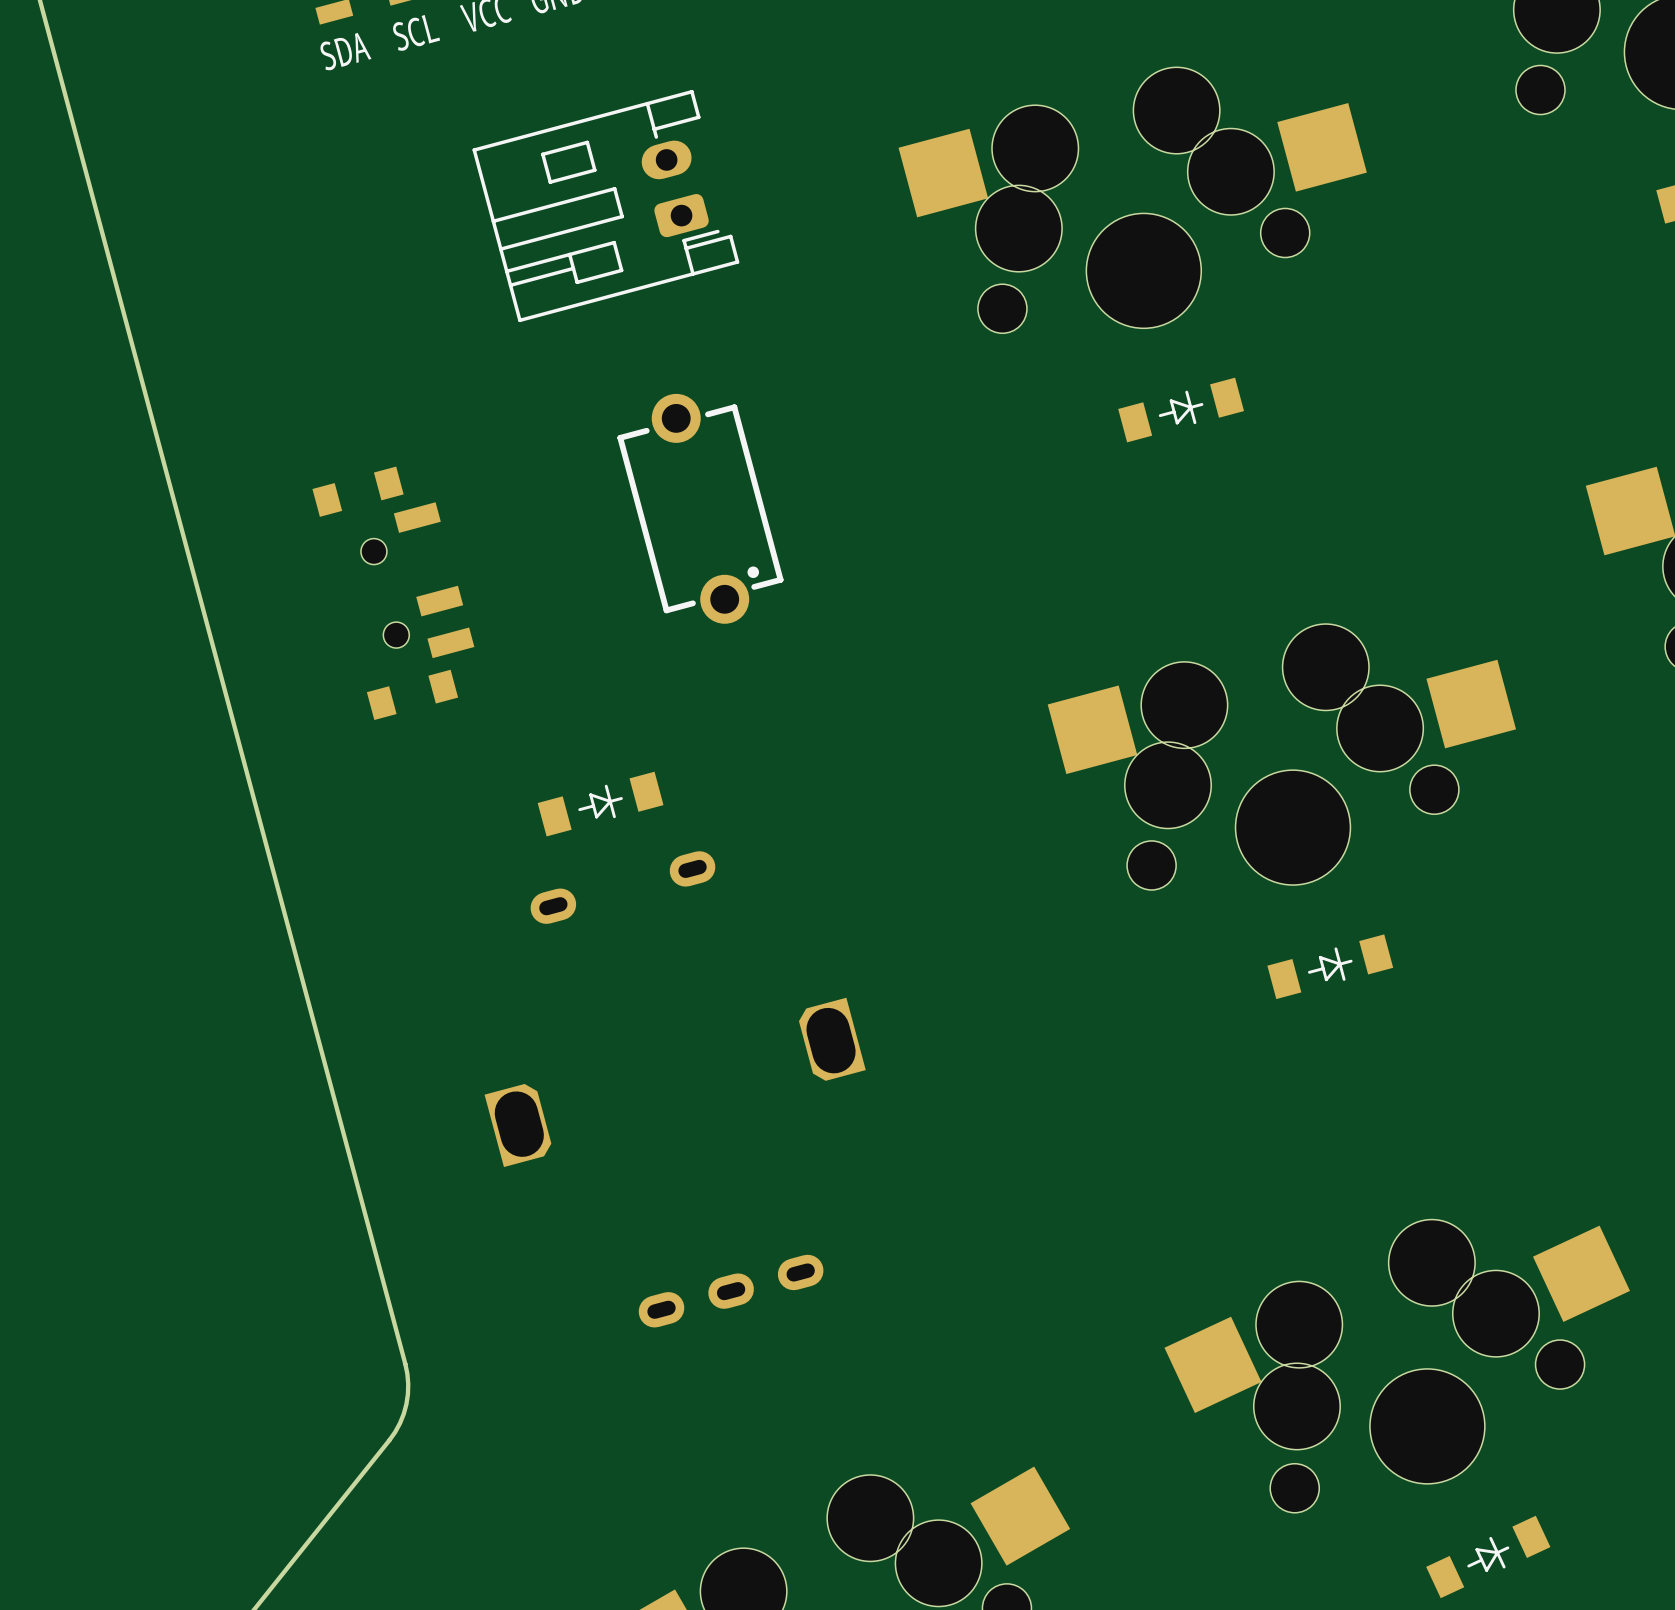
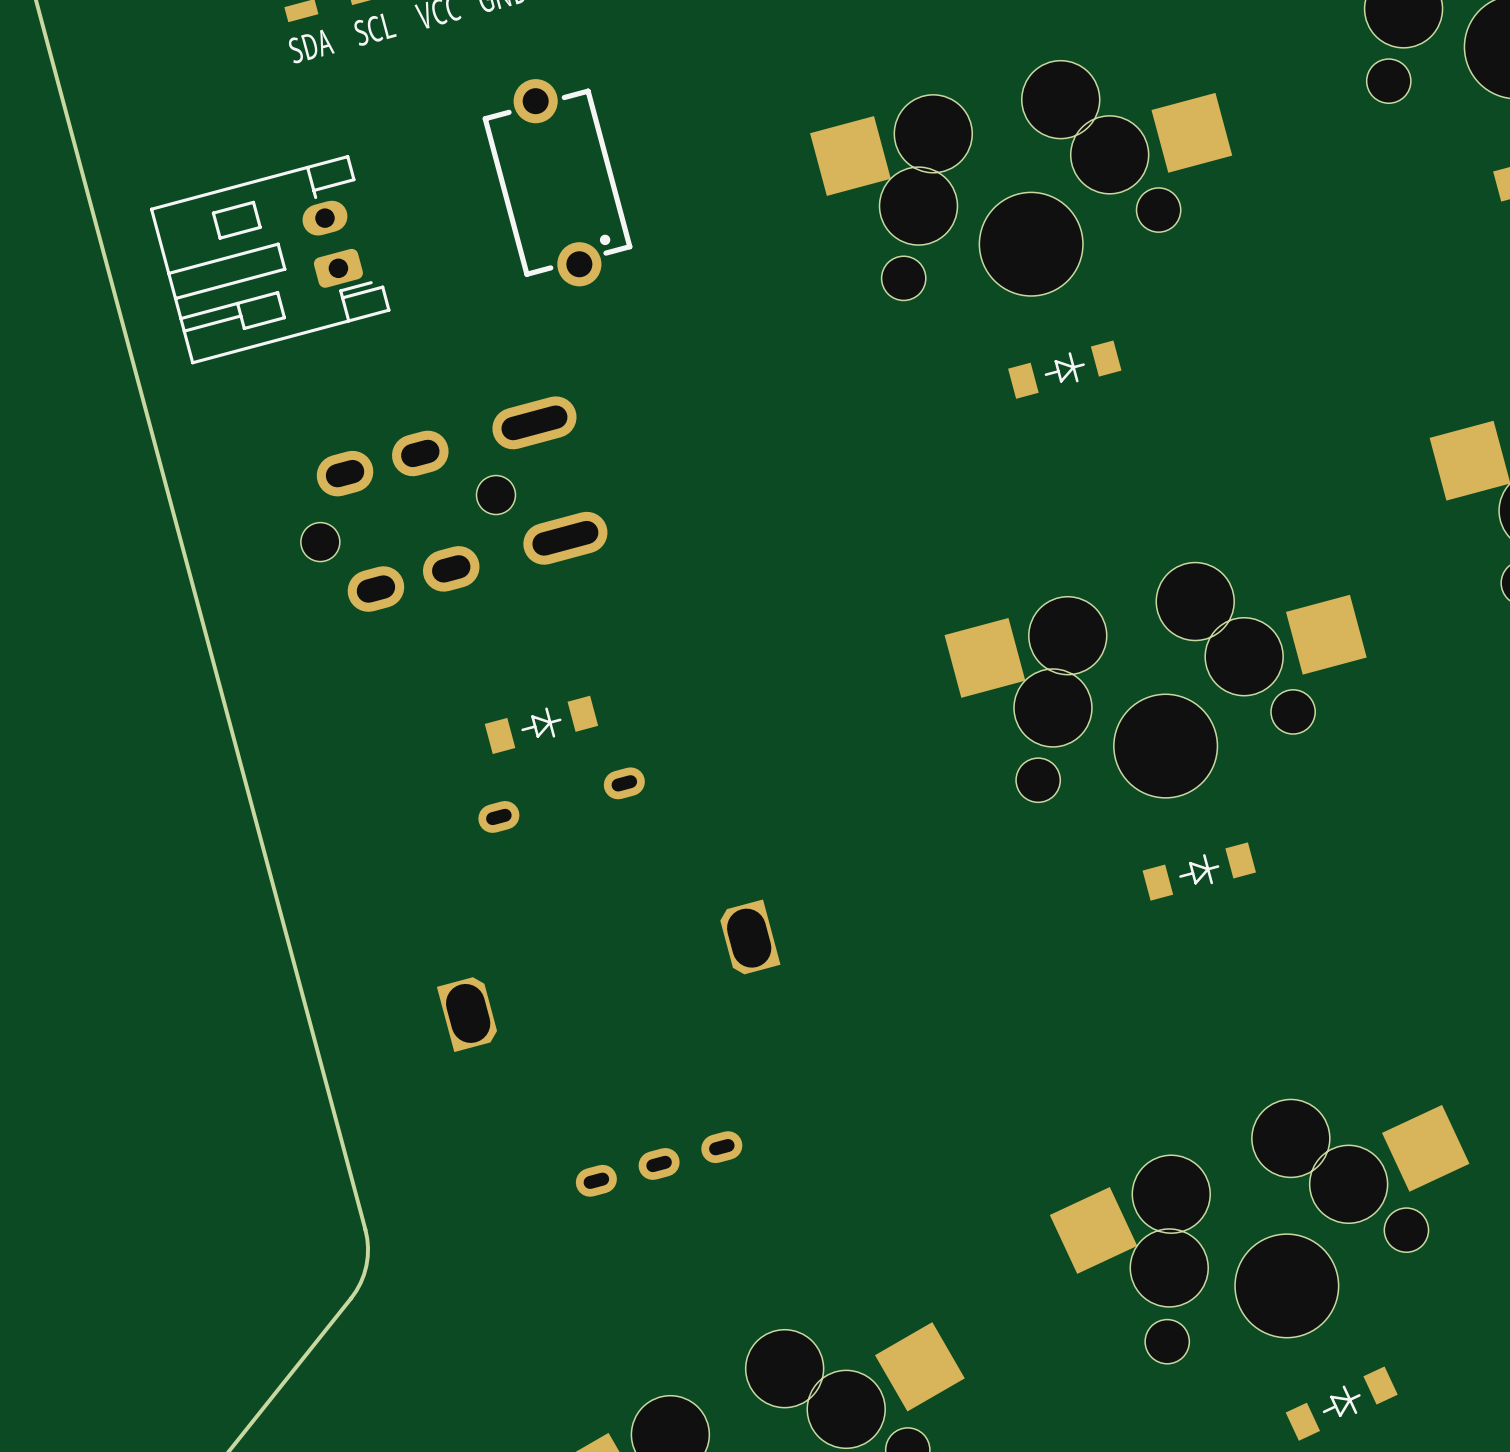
part footprint: [472, 89, 740, 323] -> [482, 79, 633, 287]
part: none -> (270, 259)
part: (700, 508) -> none
part: none -> (454, 504)
part: (393, 593) -> none

